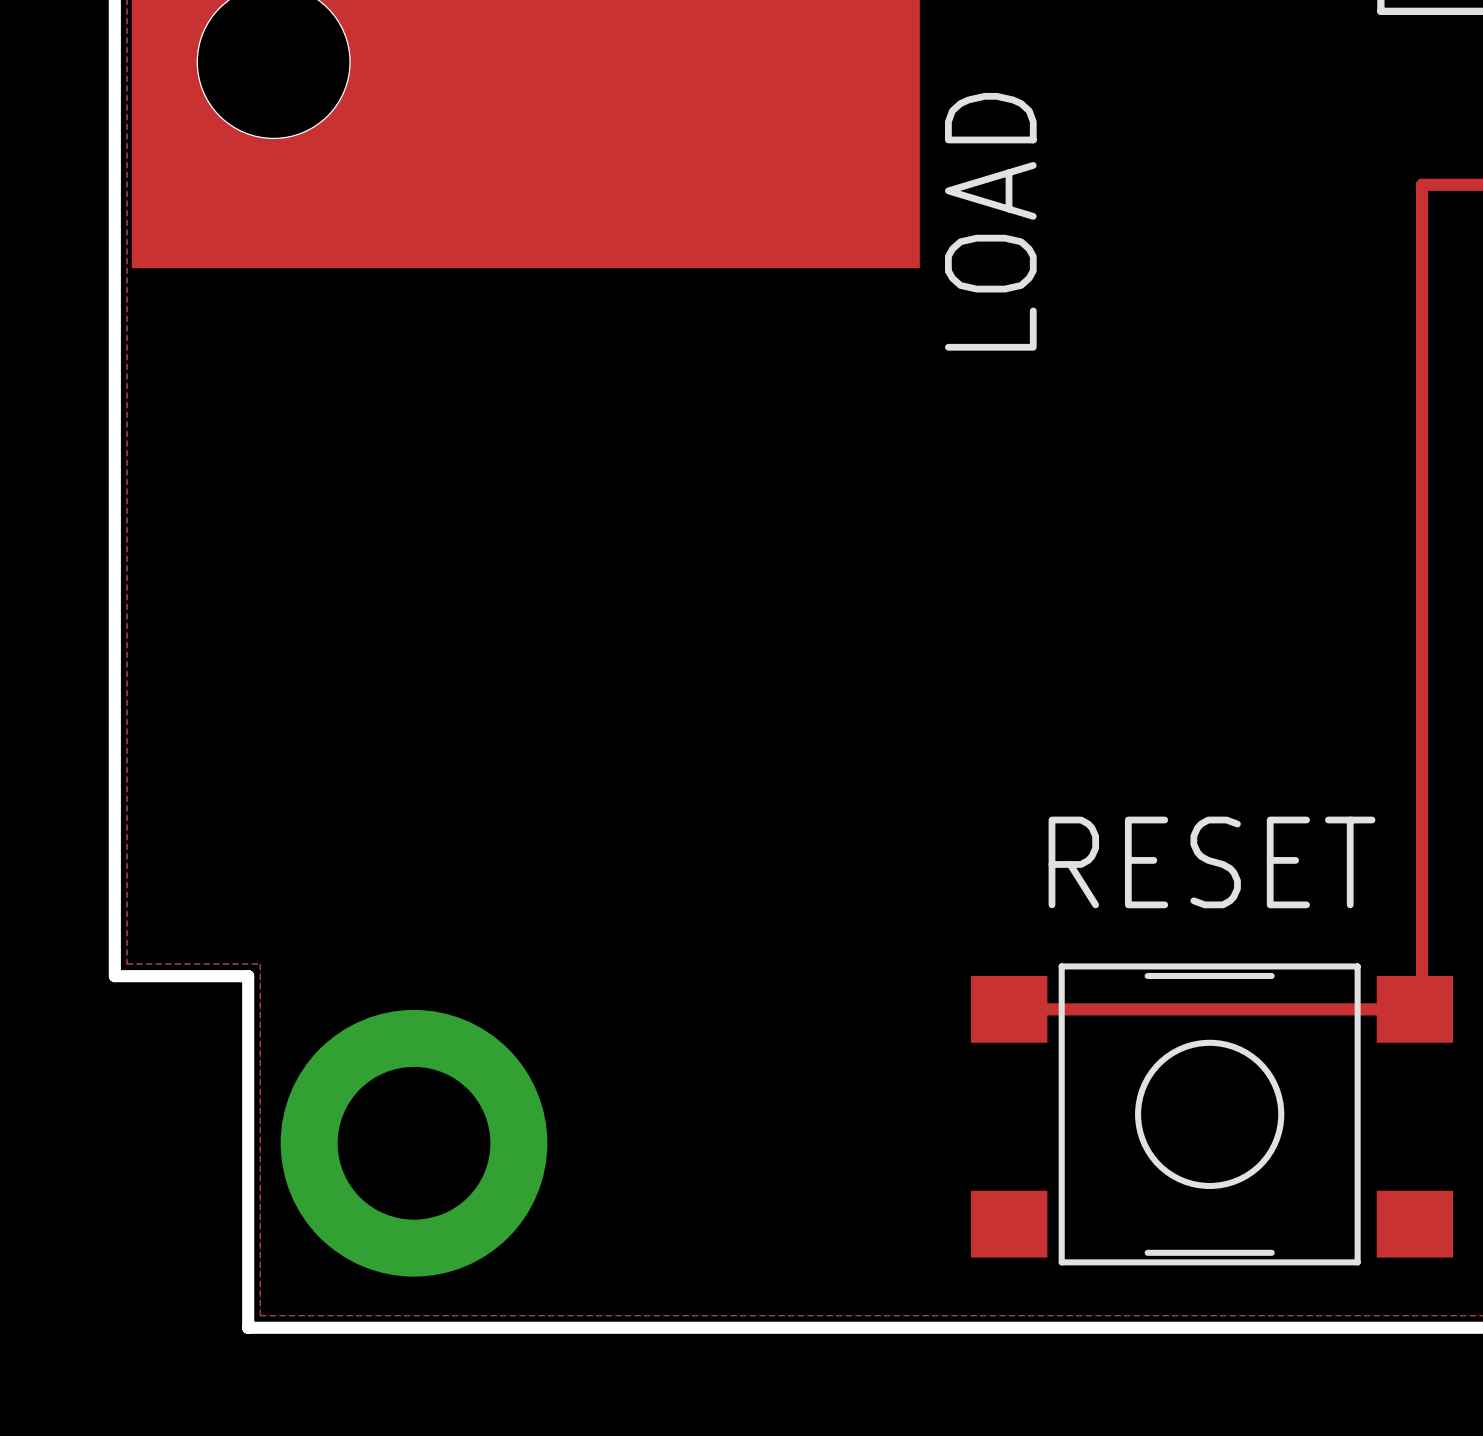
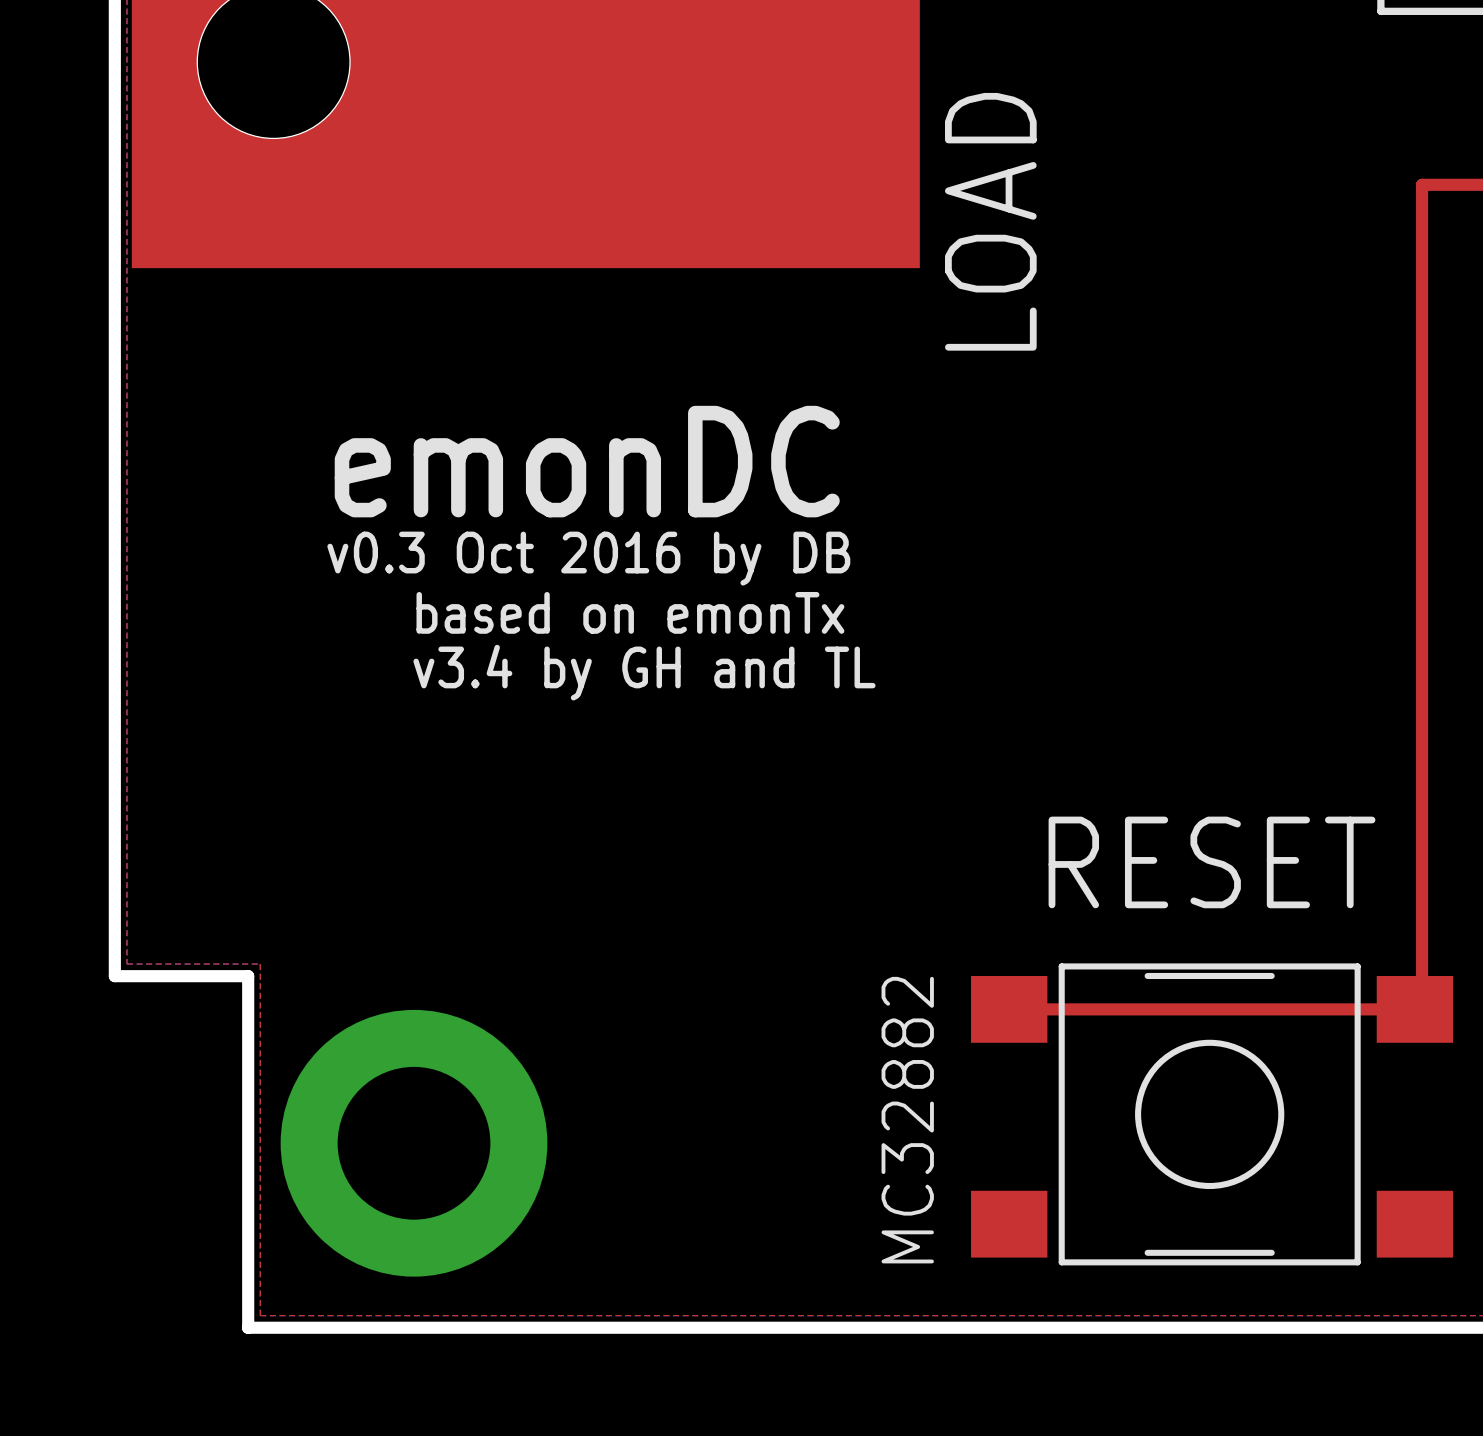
text: none -> emonDC (587, 461)
text: none -> v0.3 Oct 2016 by DB (588, 558)
text: none -> based on emonTx (630, 612)
text: none -> v3.4 by GH and TL (644, 672)
text: none -> MC32882 (907, 1120)

